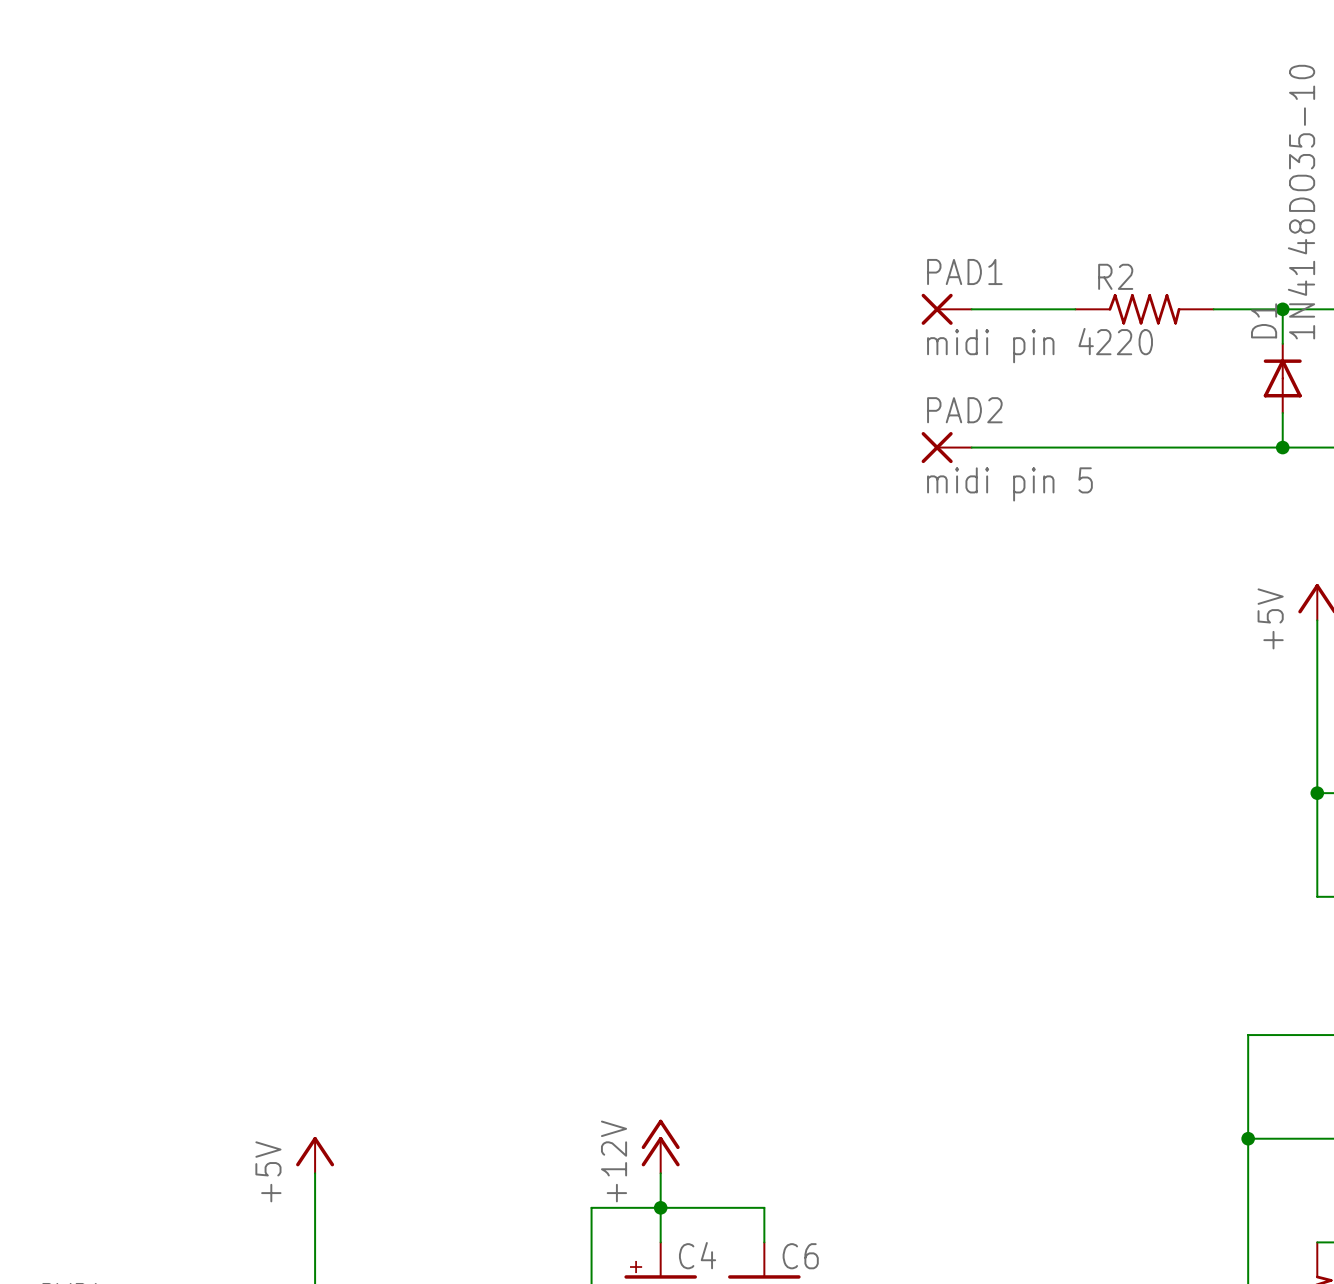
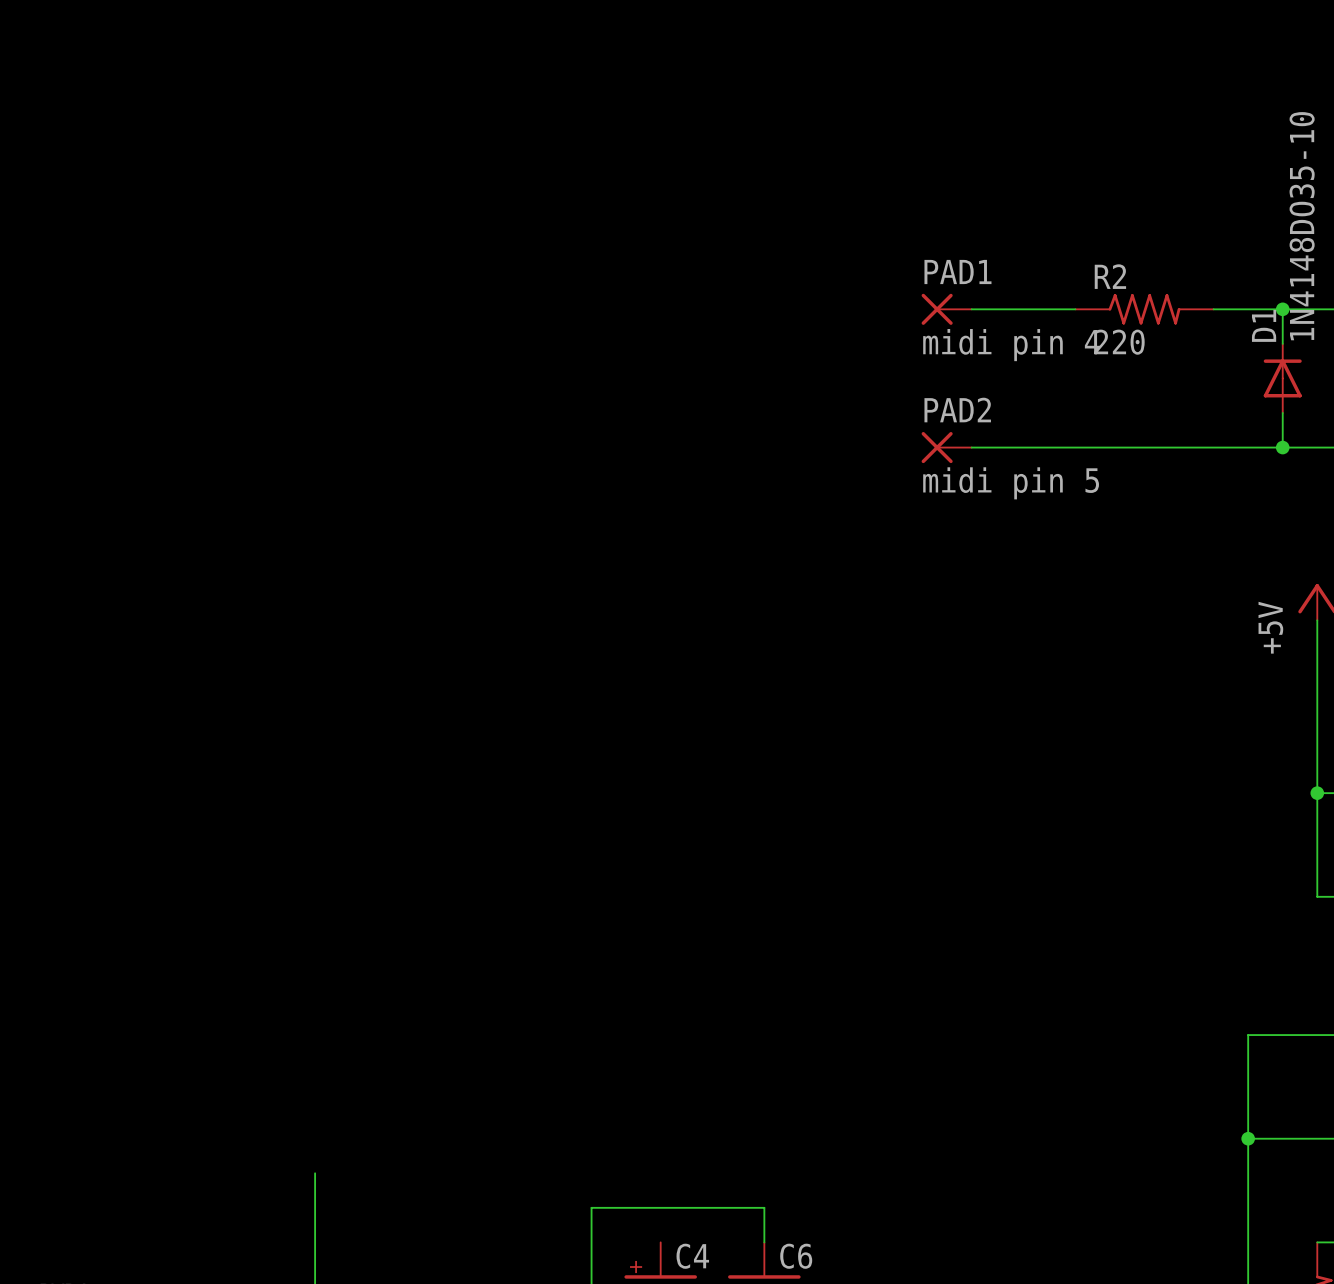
power symbol: +12V (660, 1146) -> none
power symbol: +5V (315, 1155) -> none
wire: (660, 1173) (660, 1242) -> none
junction: (660, 1207) -> none

